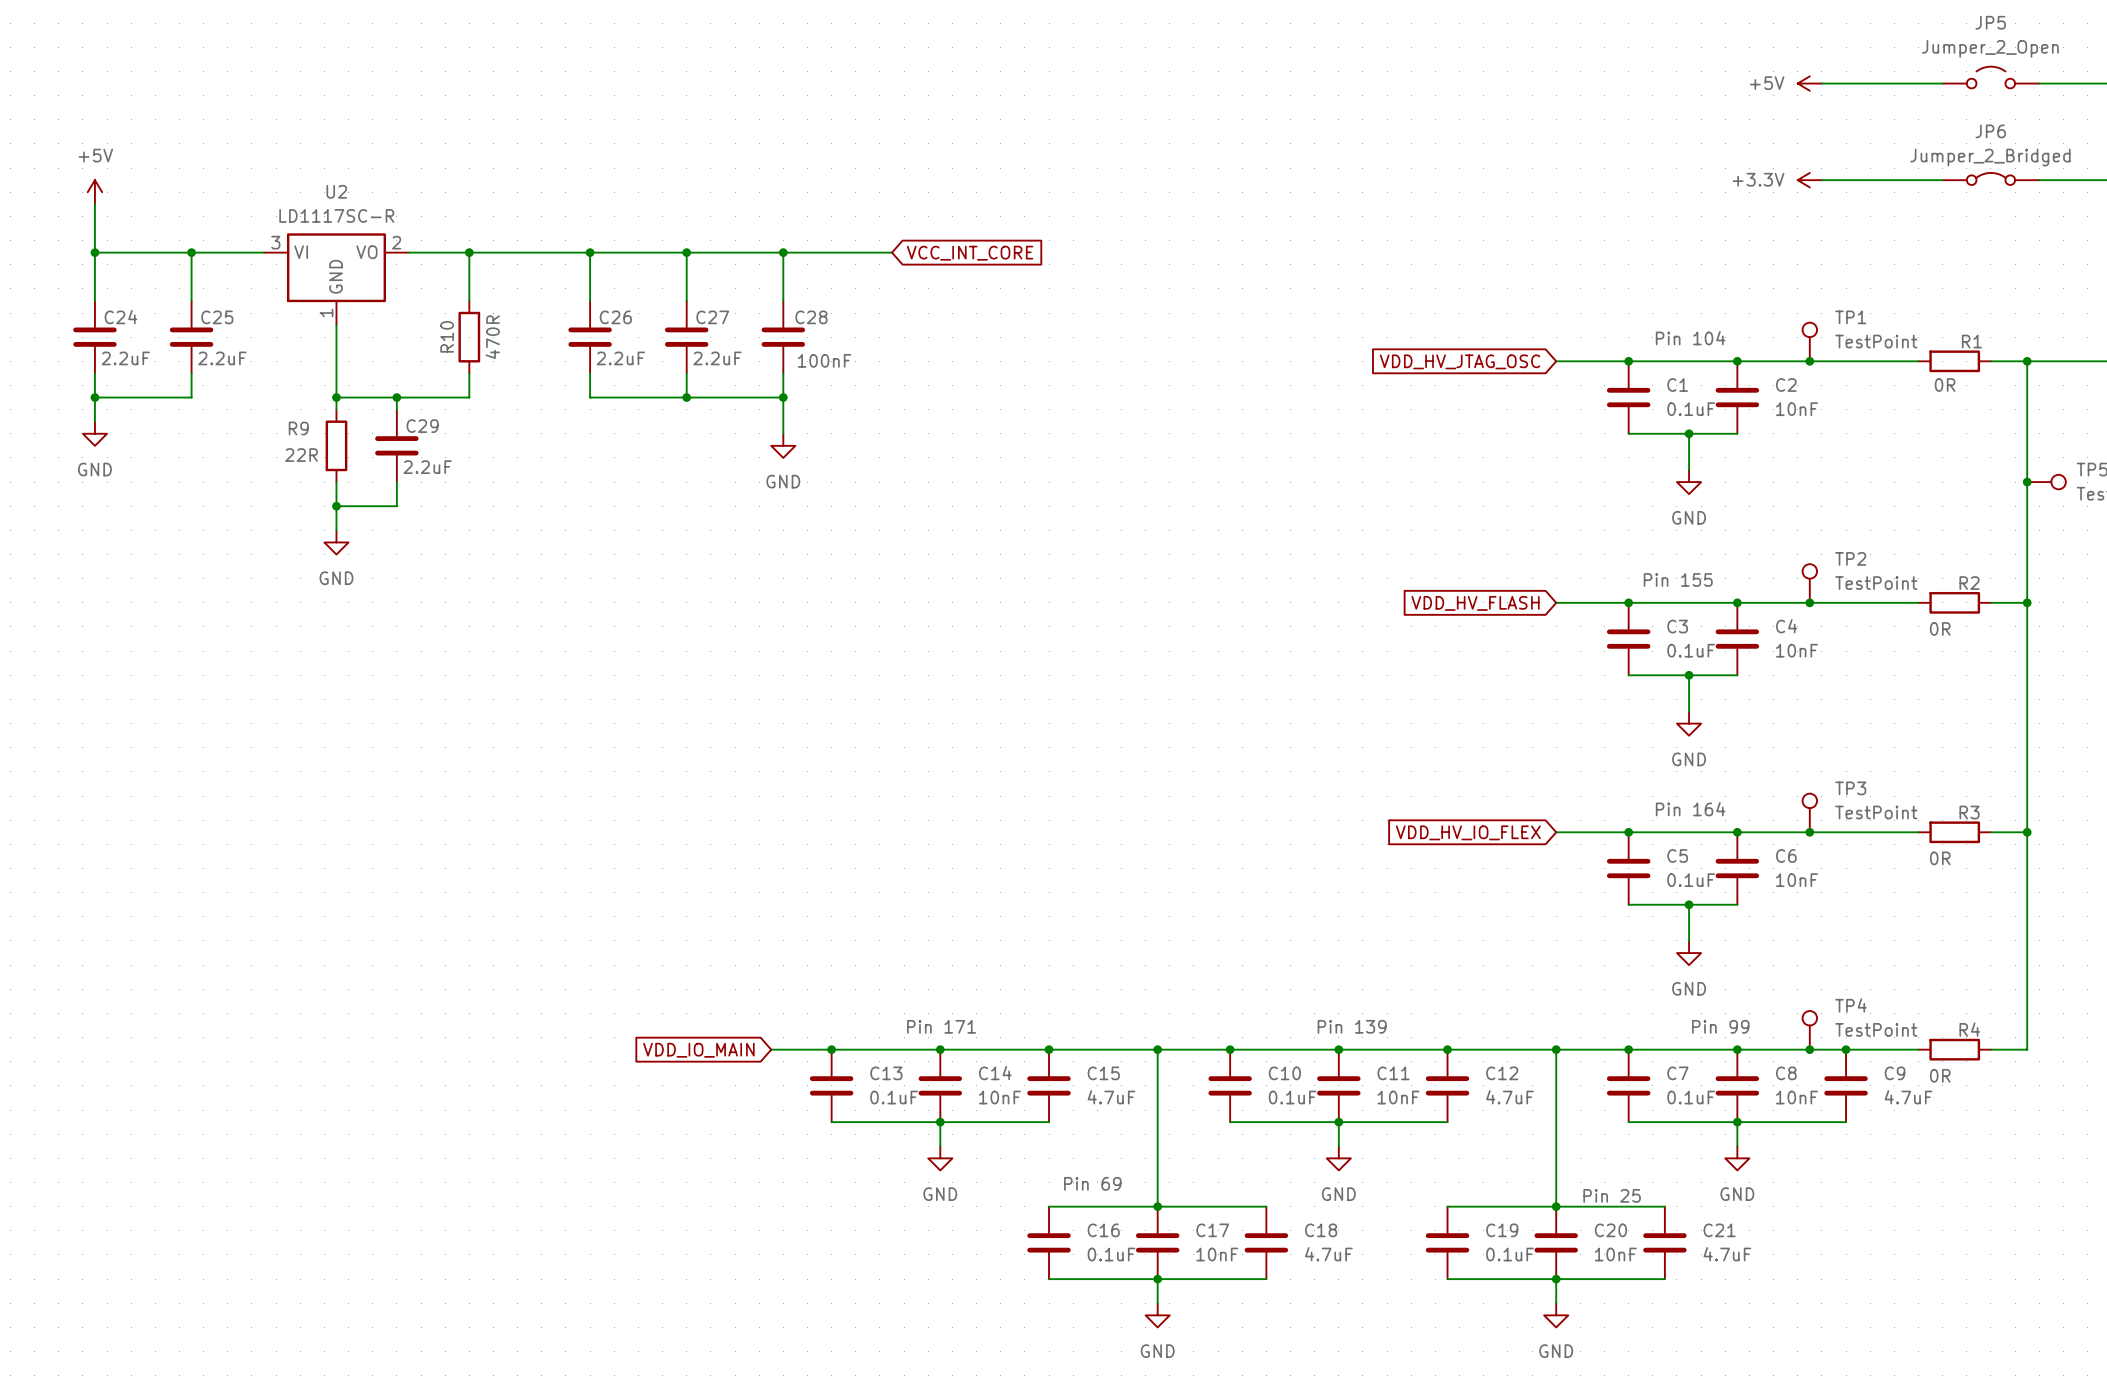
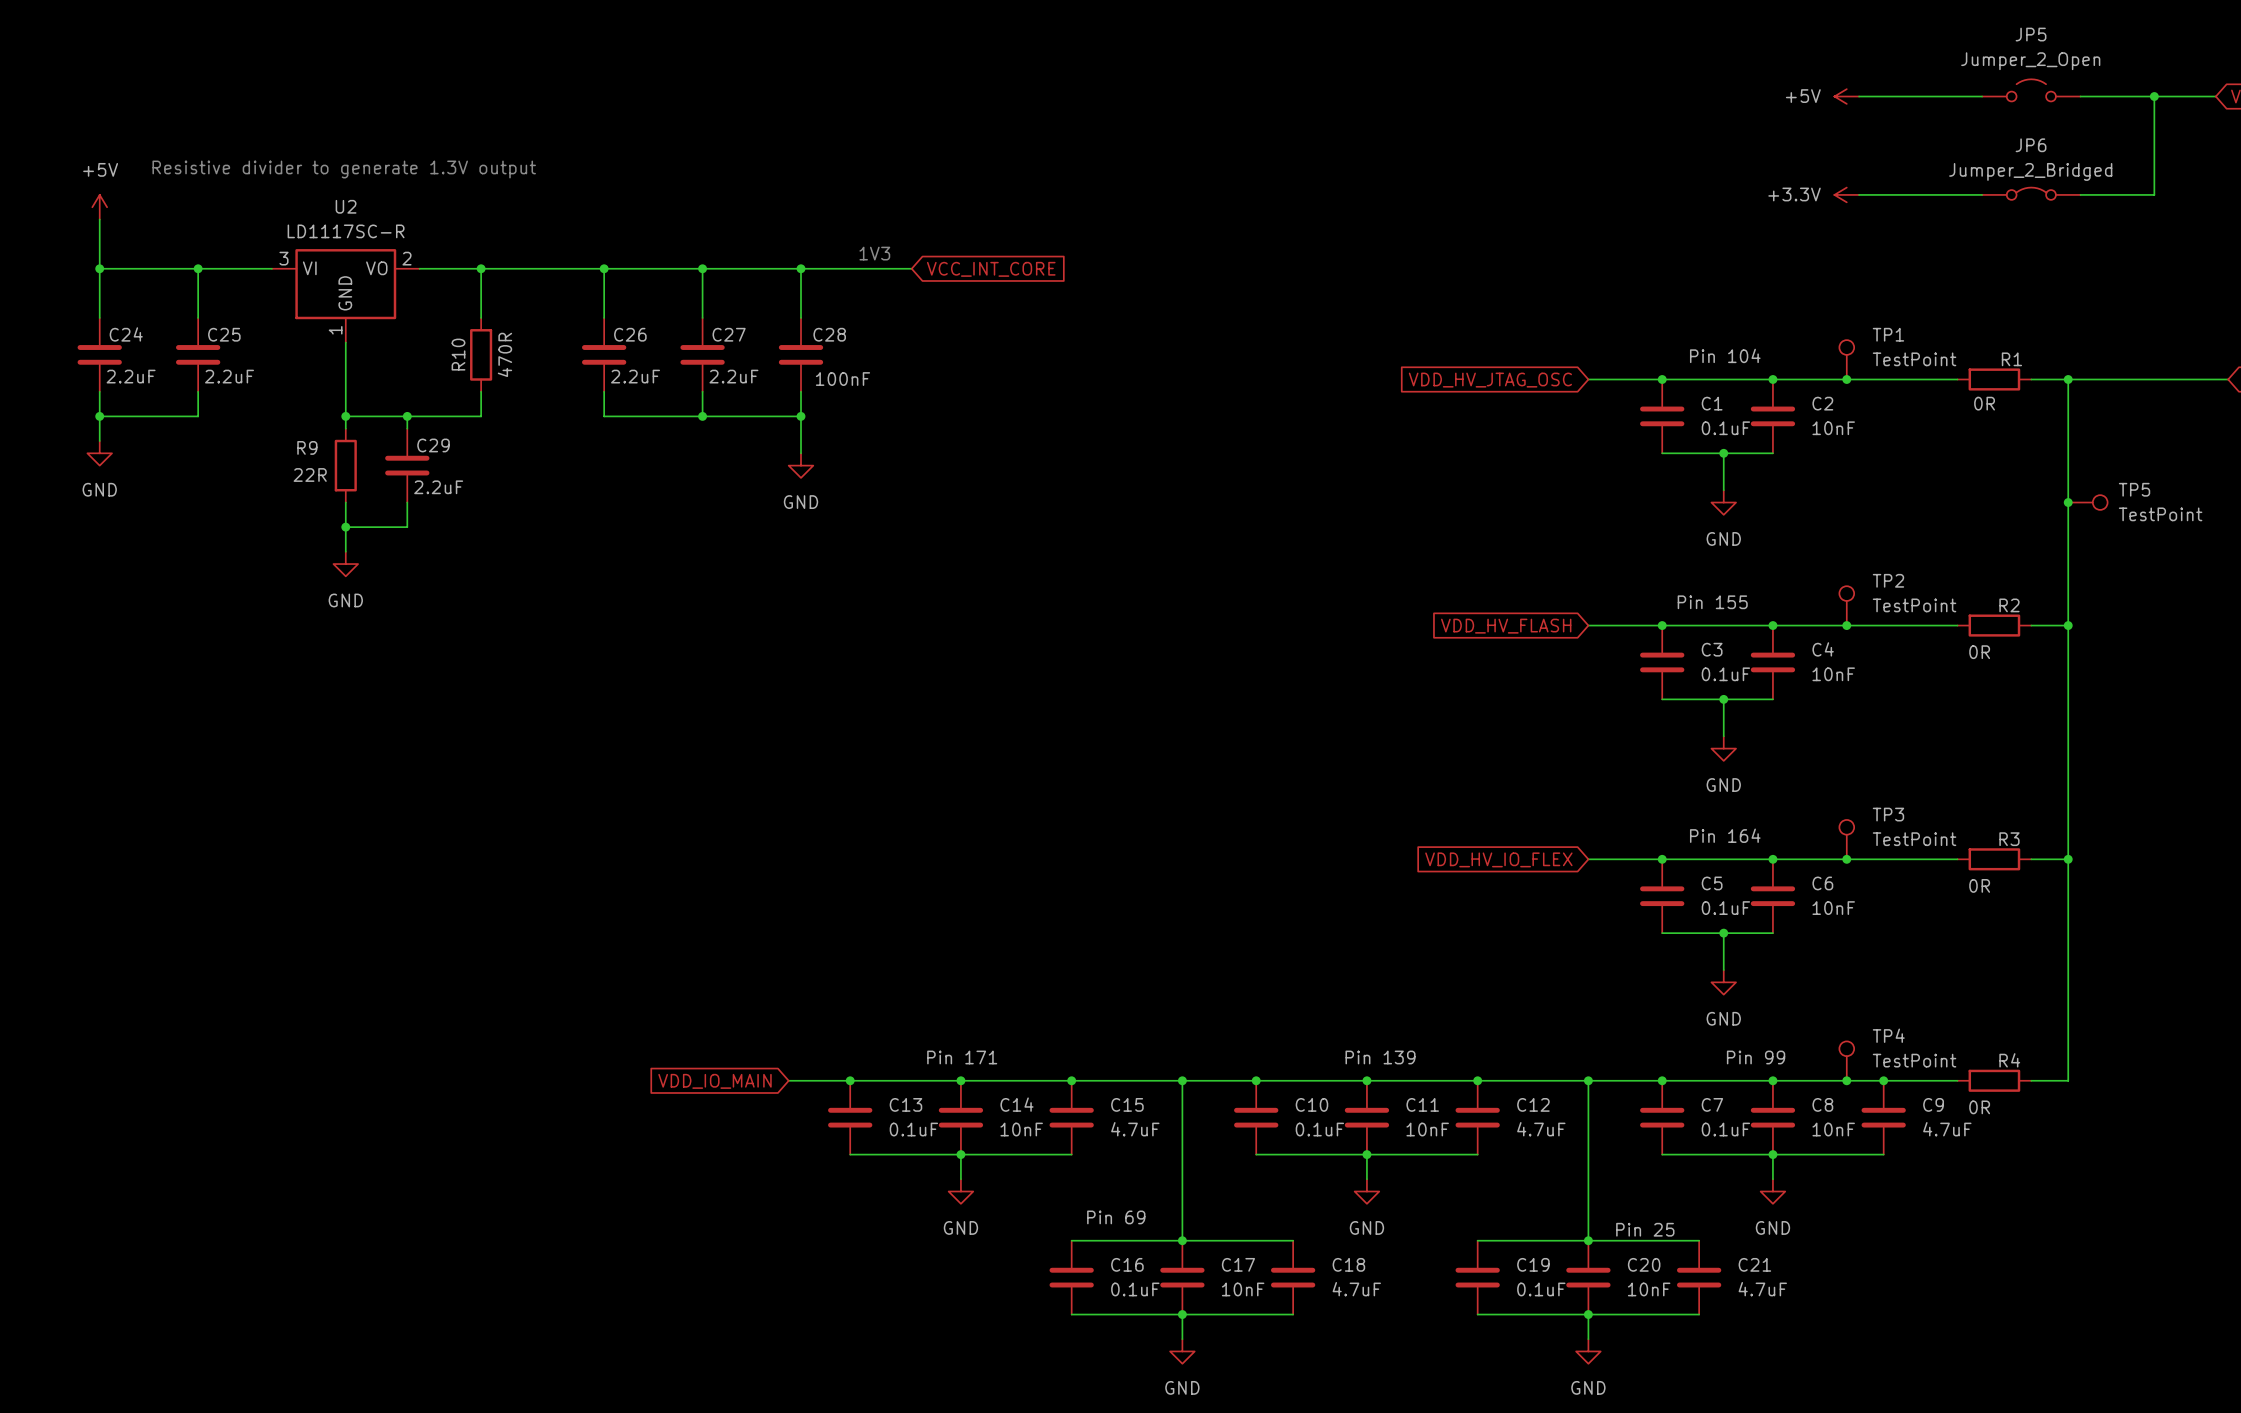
text: none -> Resistive divider to generate 1.3V output (344, 169)
text: none -> 1V3 (874, 253)

